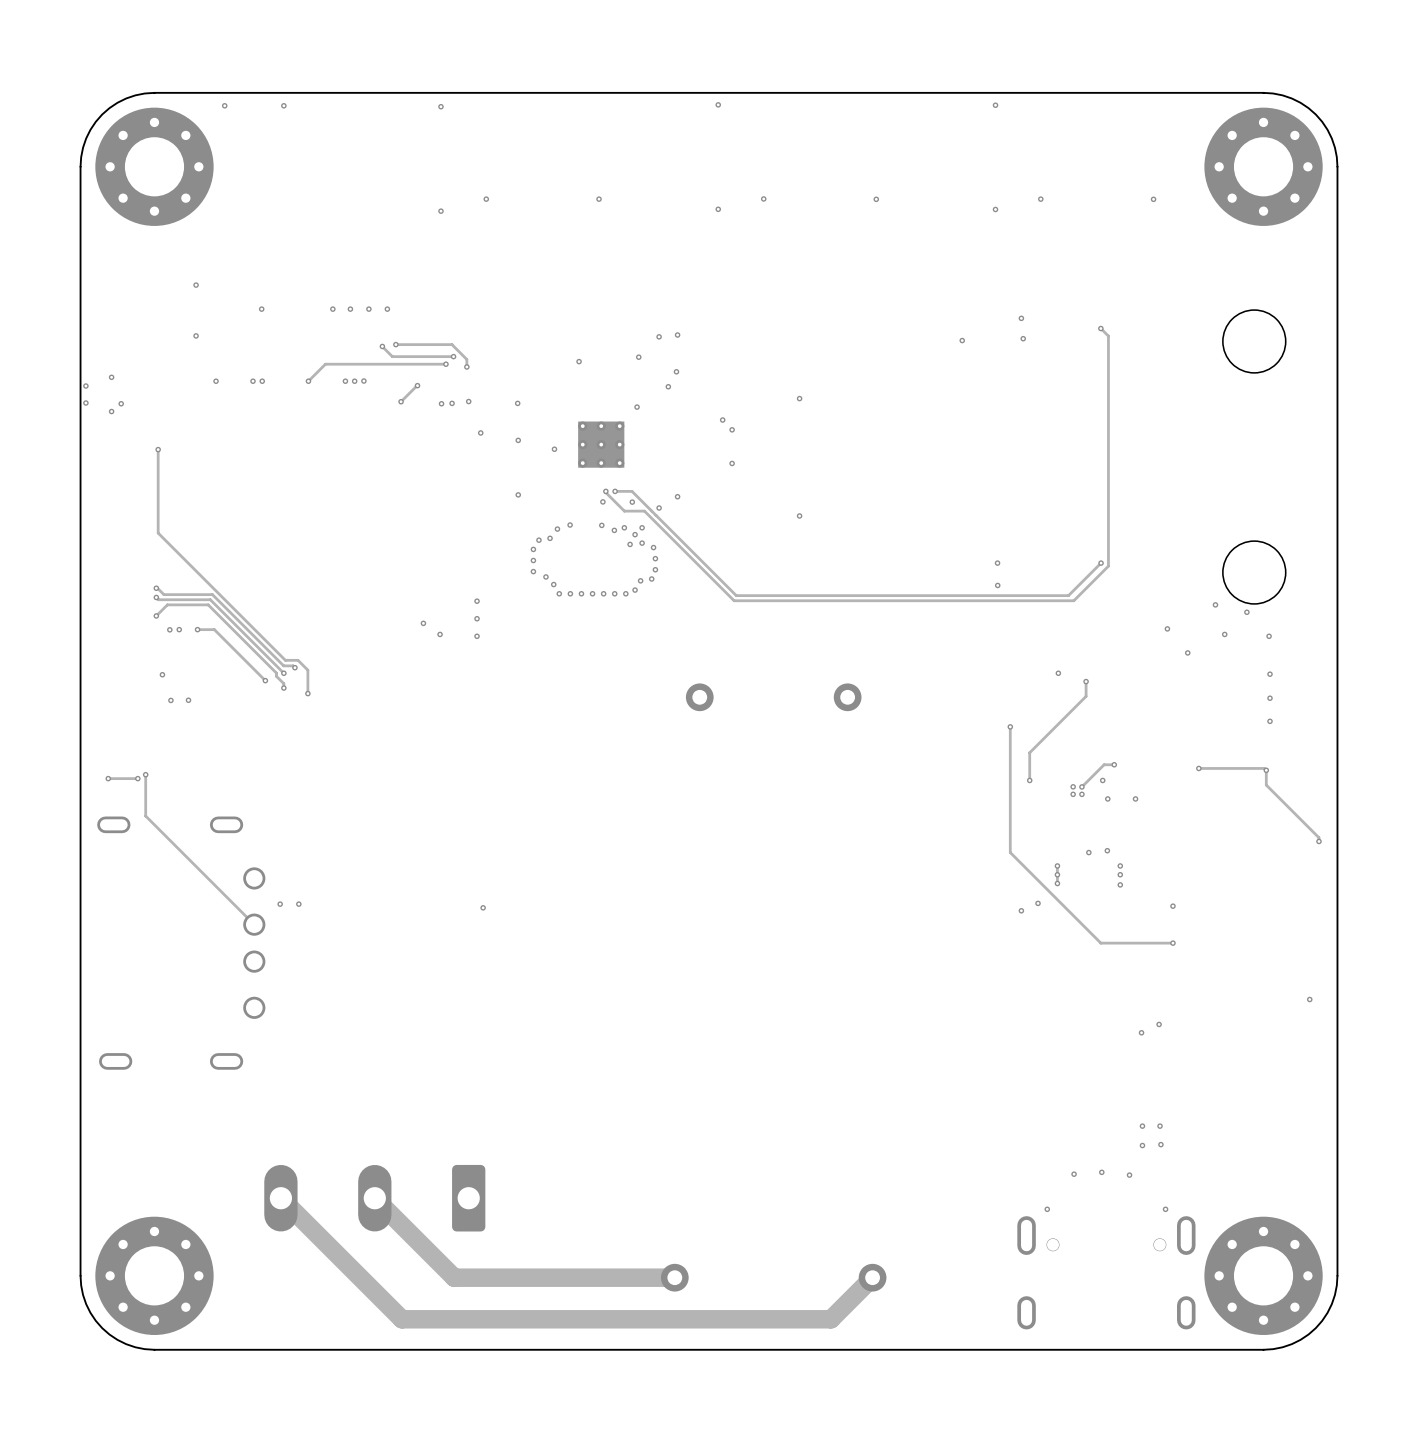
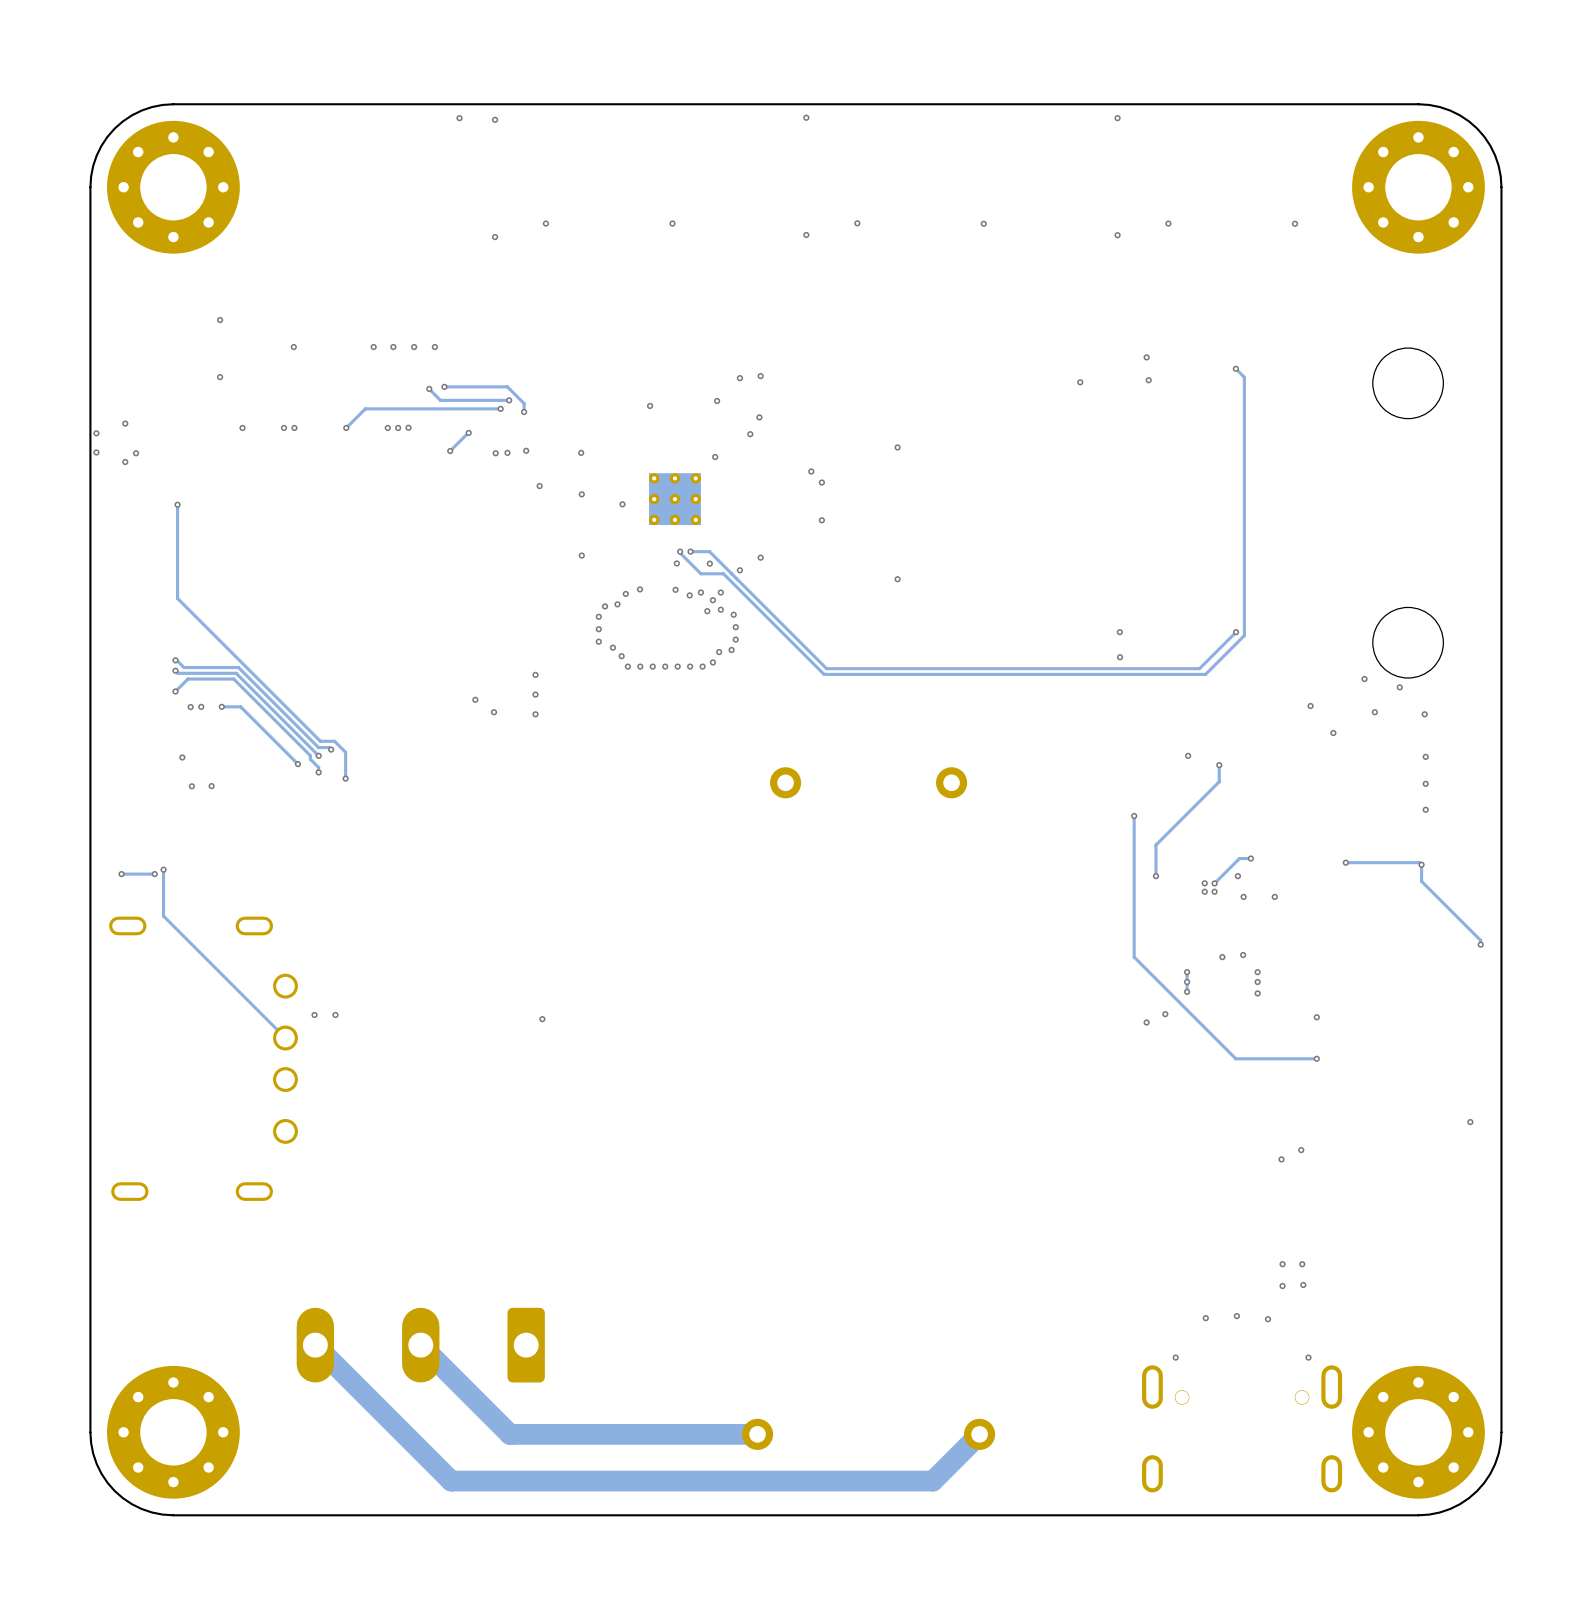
via: (224, 105) -> none
via: (283, 105) -> none
via: none -> (459, 118)

